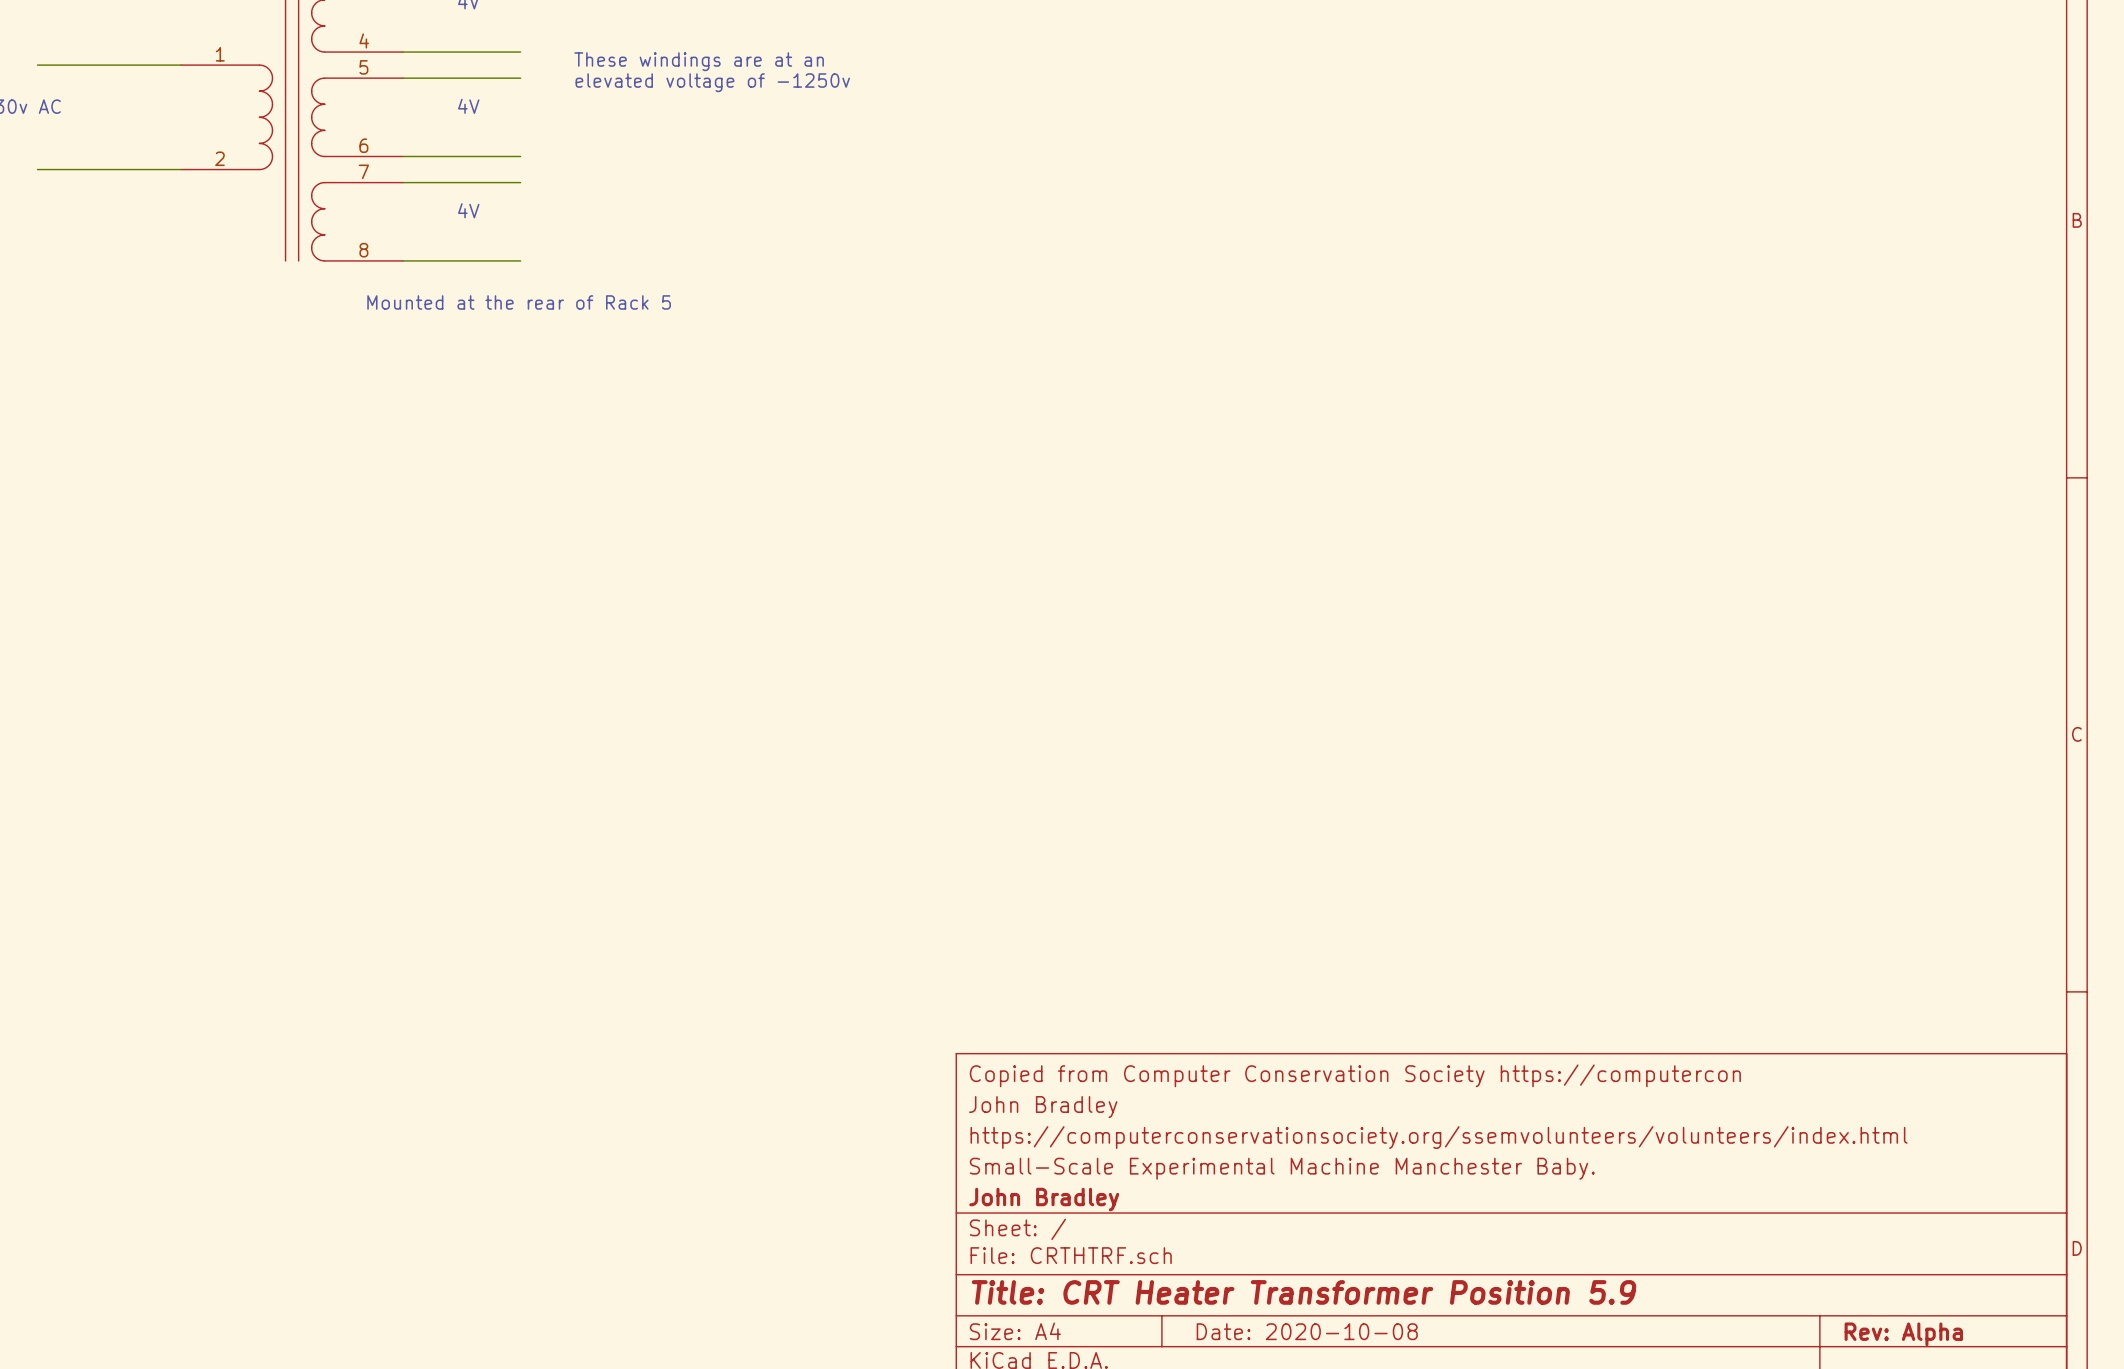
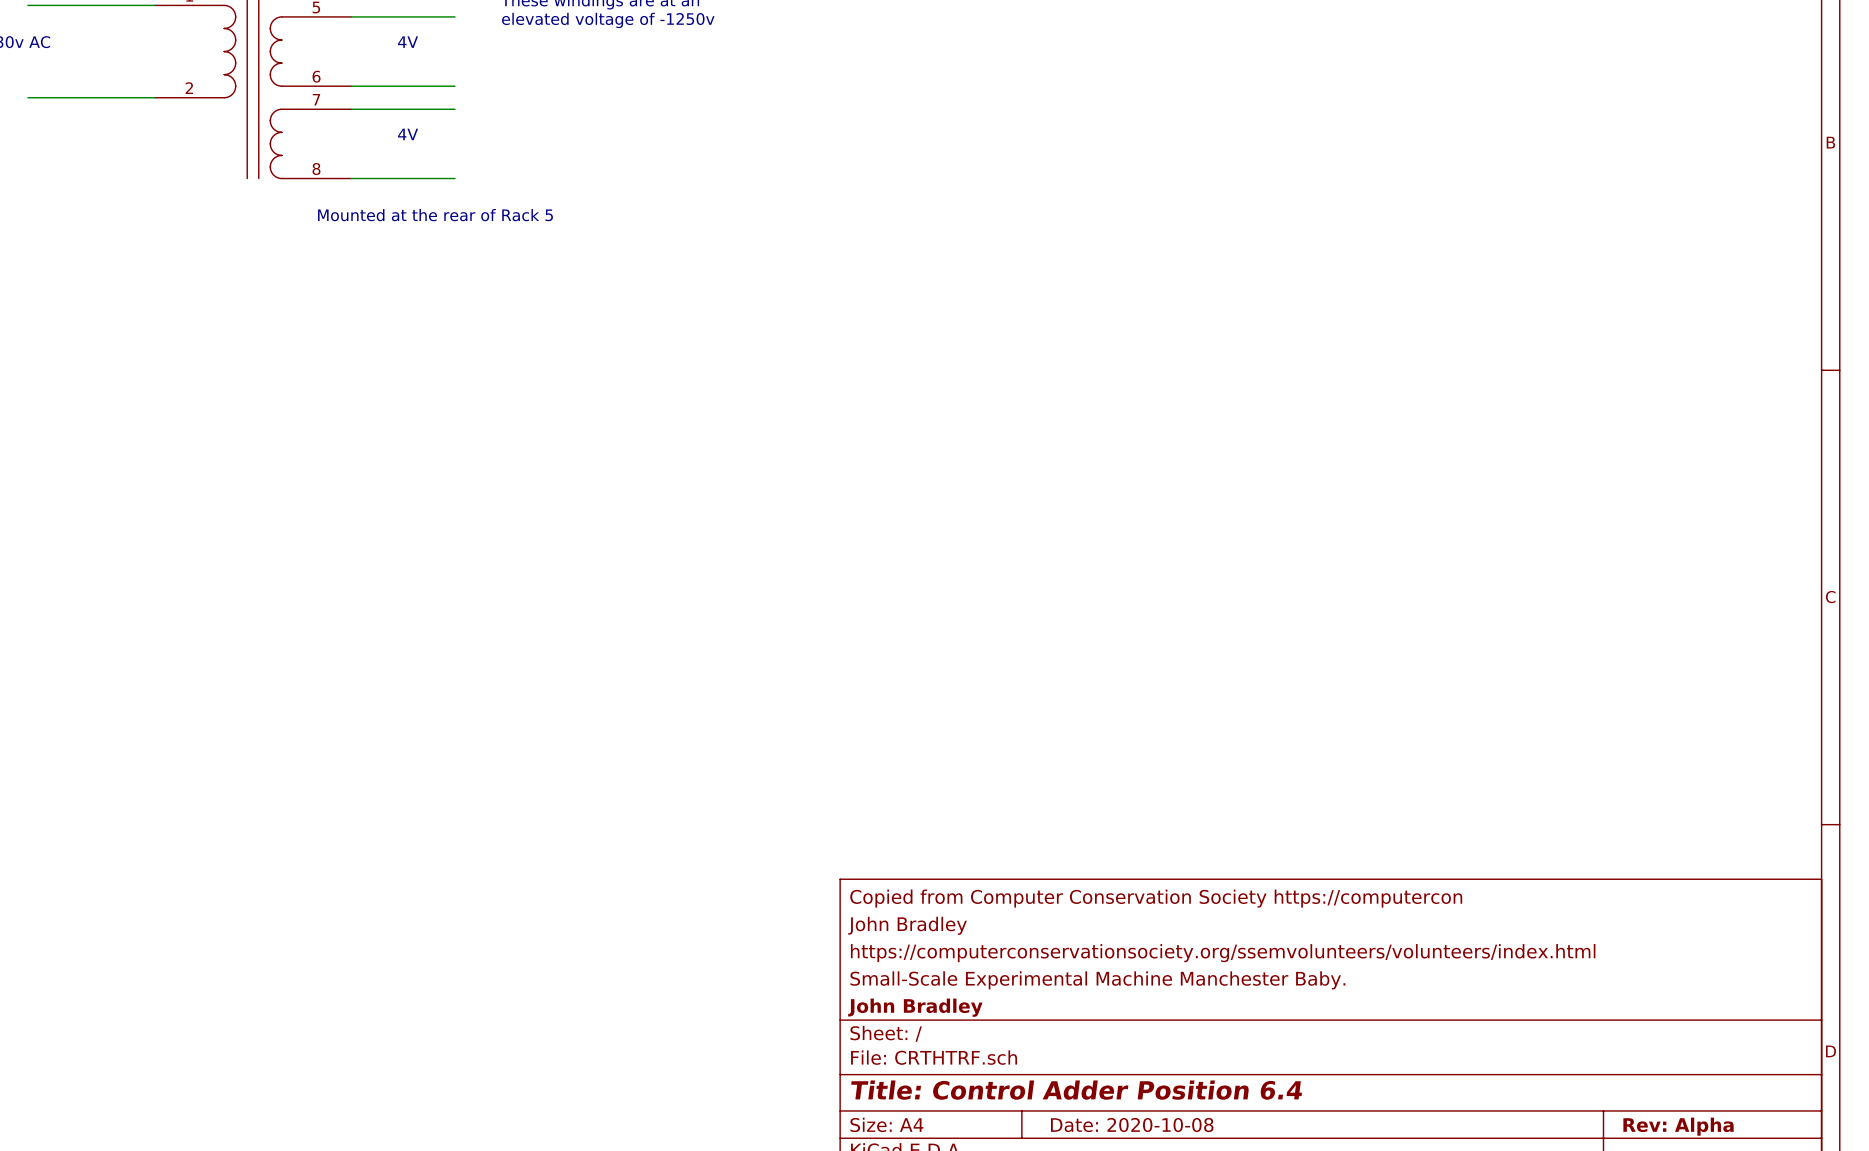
title block: Title: CRT Heater Transformer Position 5.9 (1304, 1292) -> Title: Control Adder Position 6.4 (1076, 1090)

